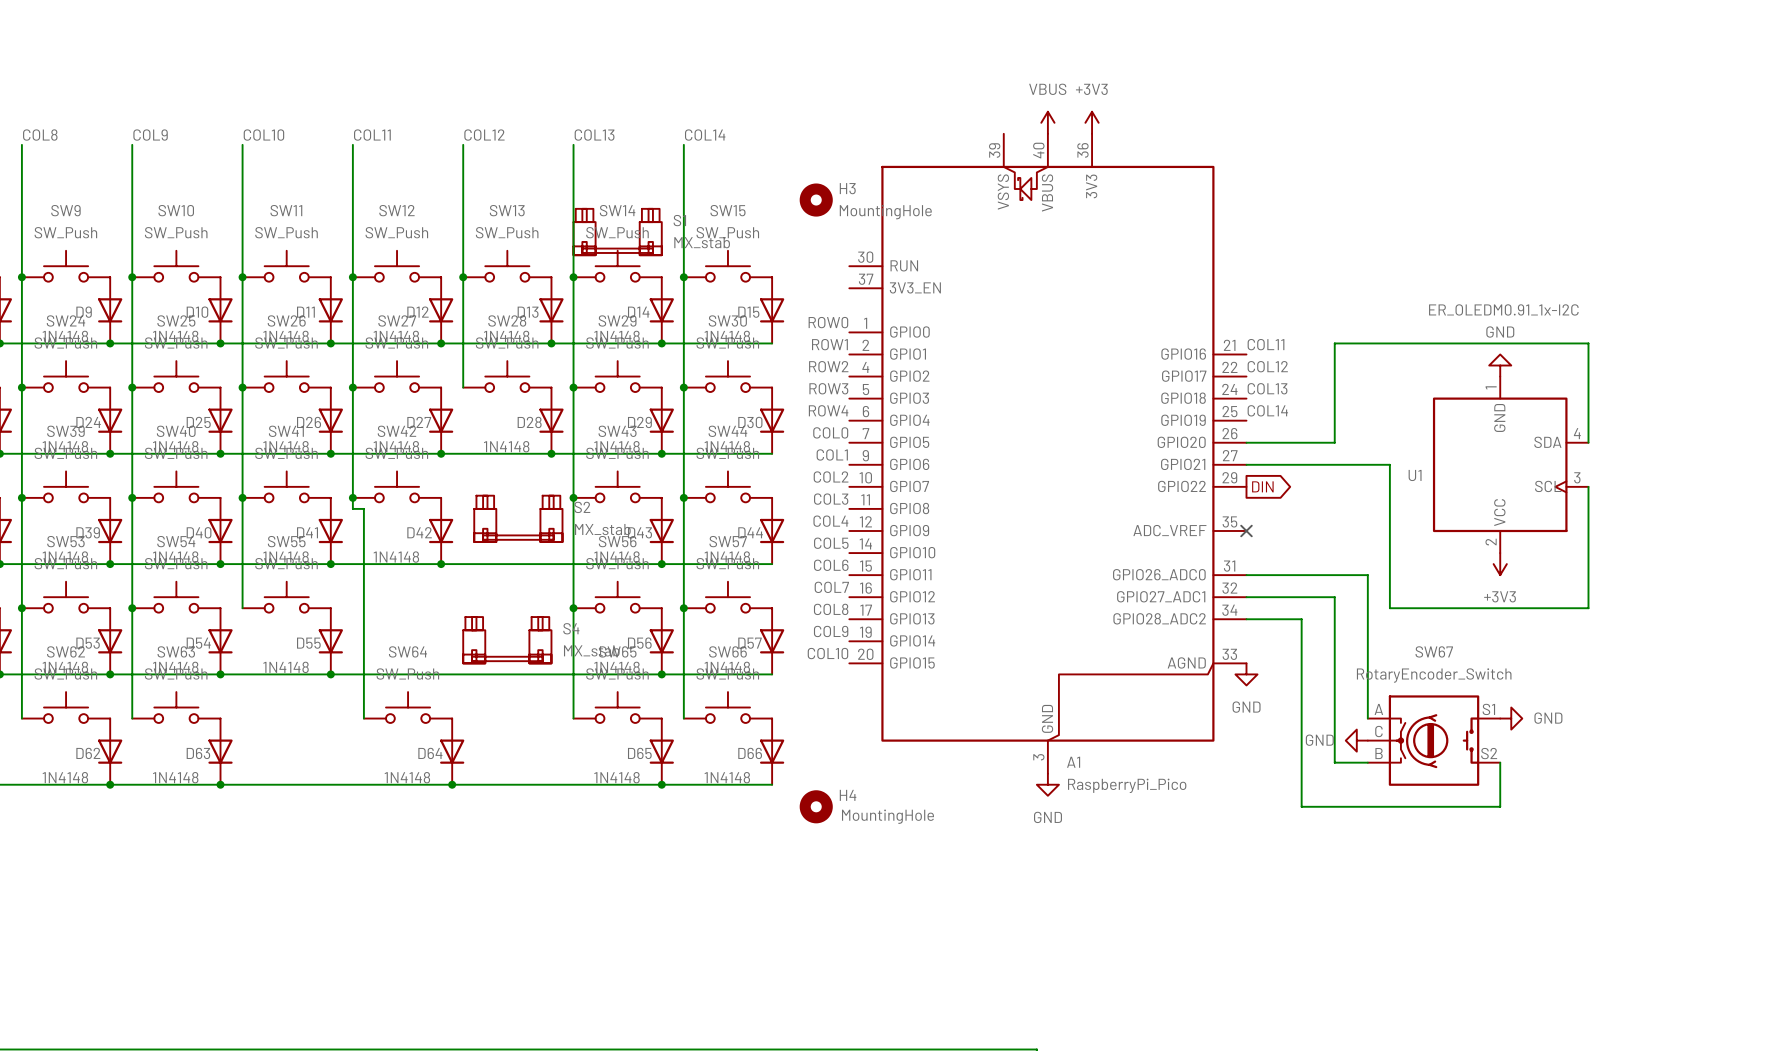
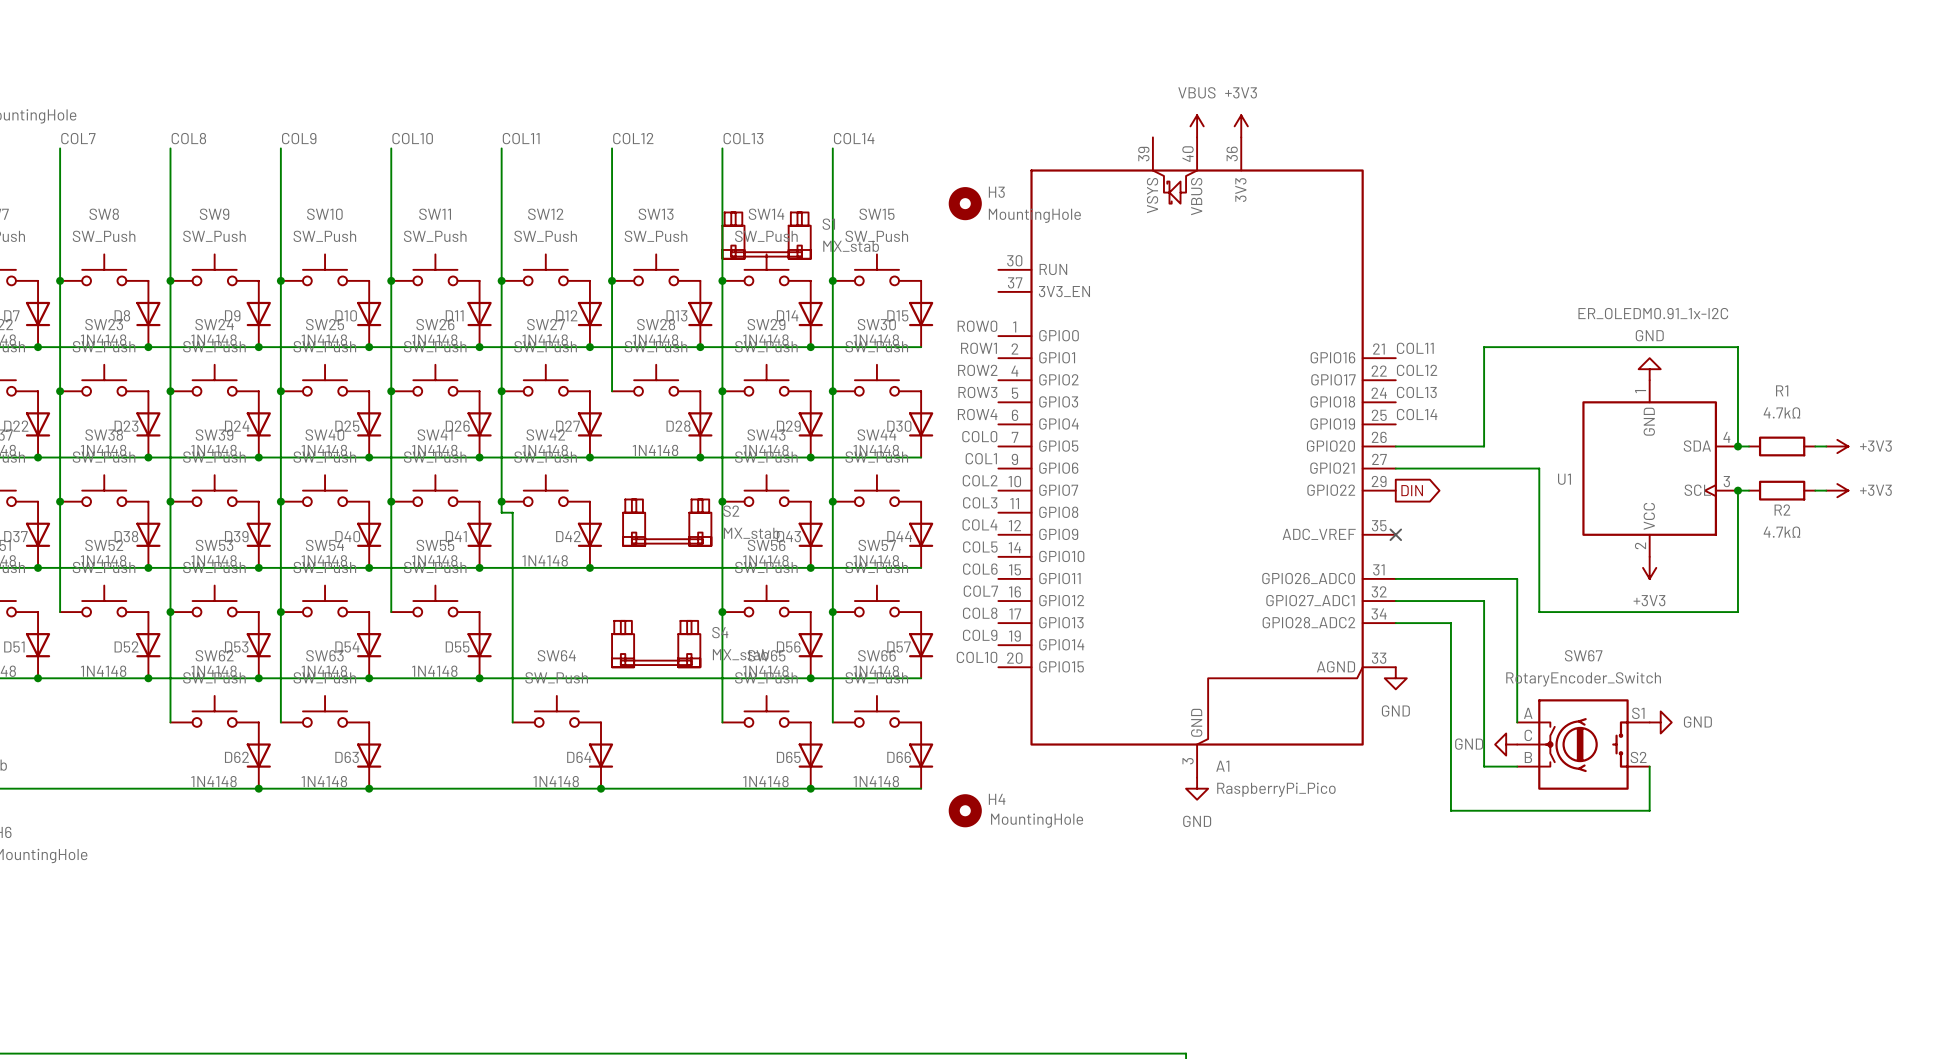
wire: none -> (1737, 446) (1749, 446)
junction: none -> (1737, 446)
R1: none -> 4.7kΩ (1782, 446)
wire: none -> (1815, 446) (1826, 446)
power symbol: none -> +3V3 (1837, 446)
wire: none -> (1737, 490) (1749, 490)
junction: none -> (1737, 490)
R2: none -> 4.7kΩ (1782, 490)
wire: none -> (1815, 490) (1826, 490)
power symbol: none -> +3V3 (1837, 490)

